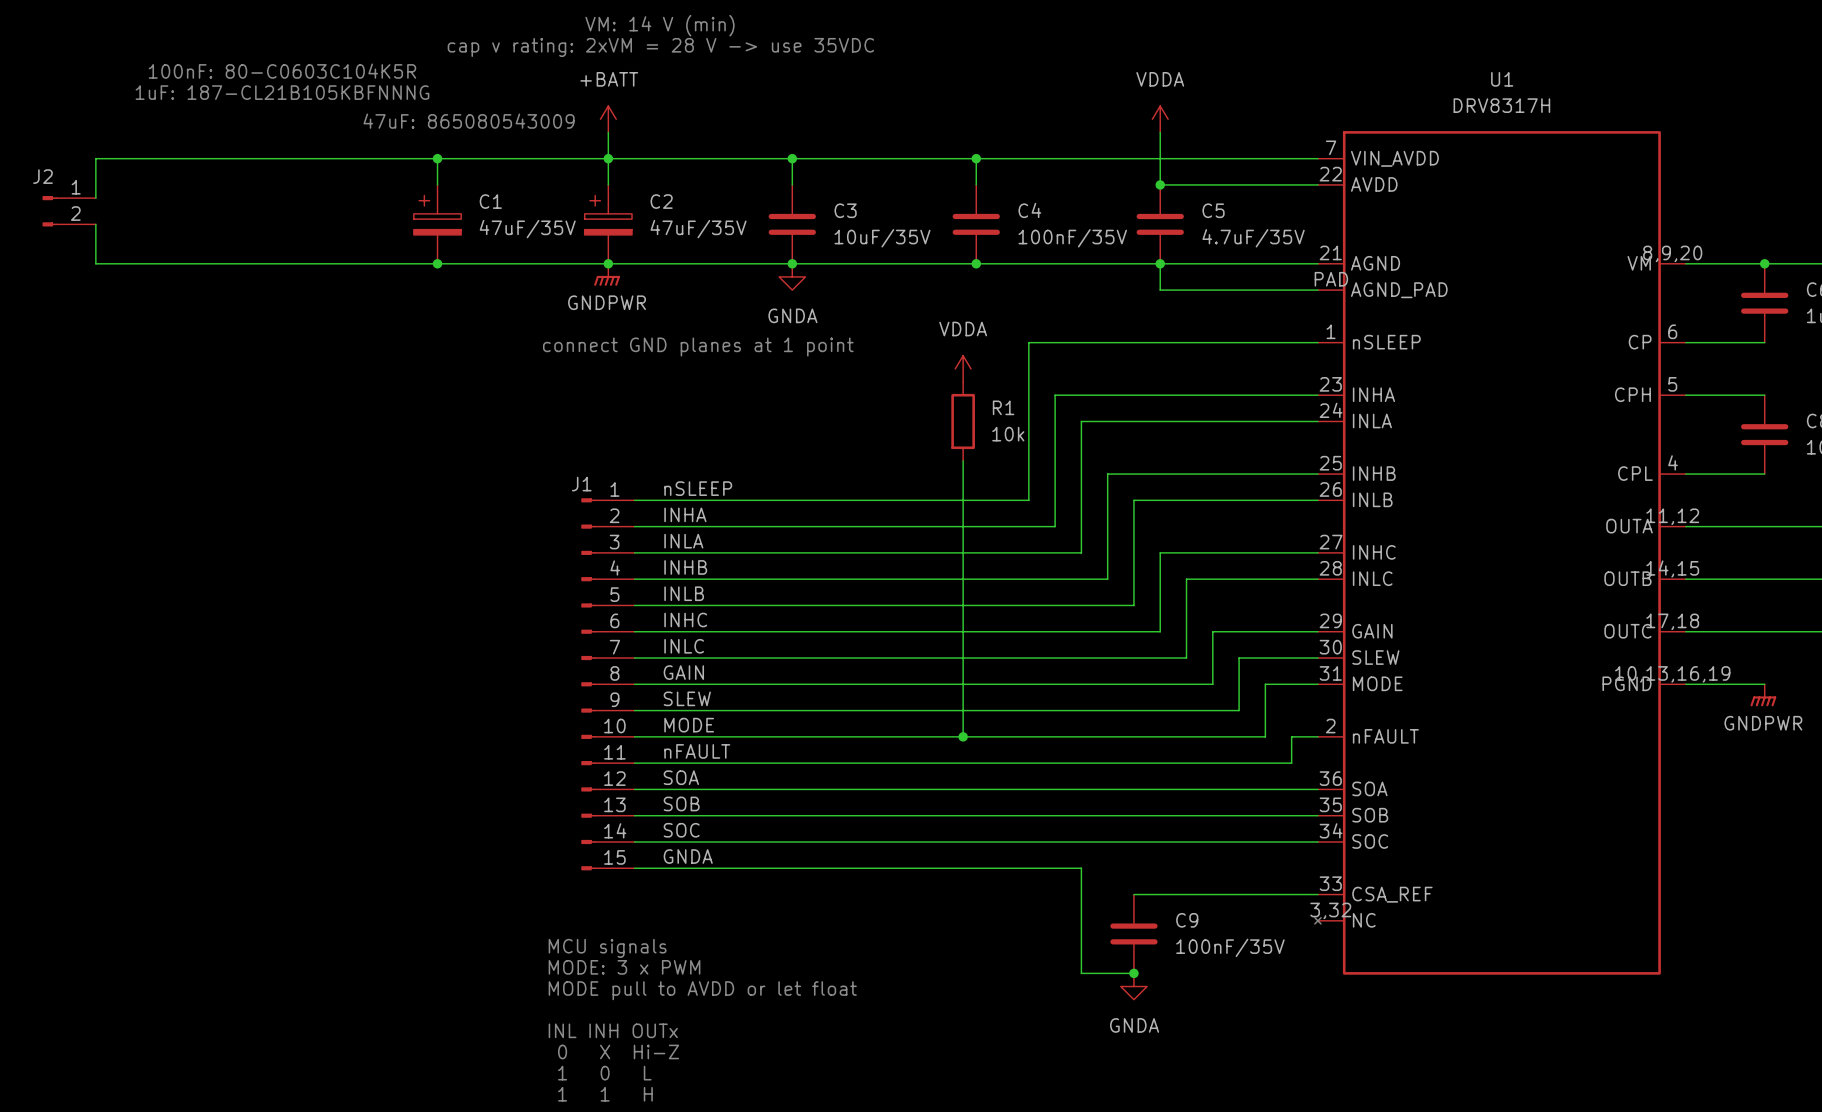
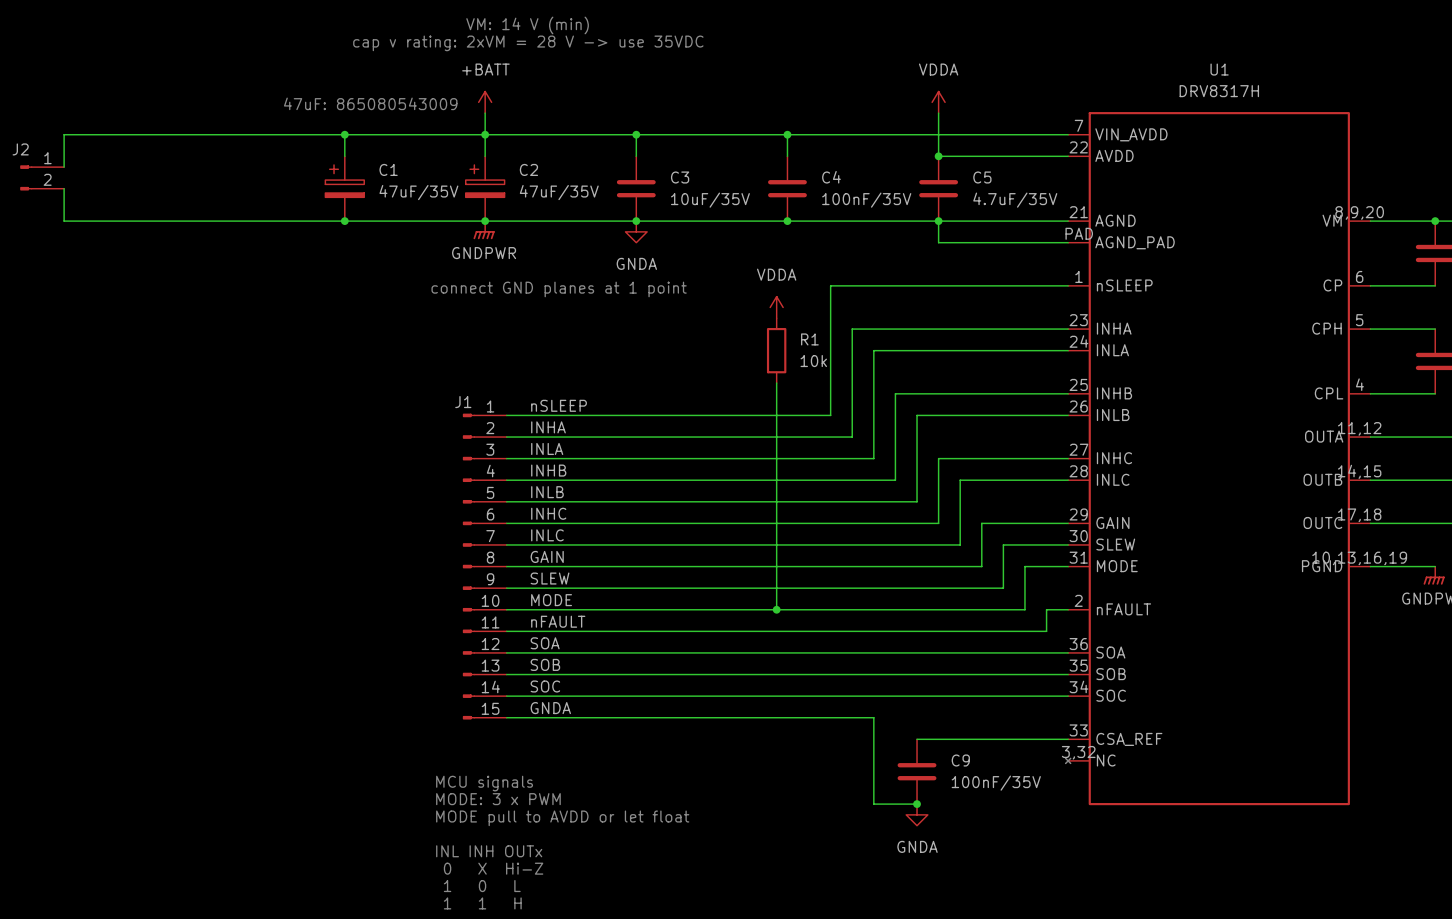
text: 100nF: 80-C0603C104K5R (282, 71) -> none
text: 1uF: 187-CL21B105KBFNNNG (282, 92) -> none

